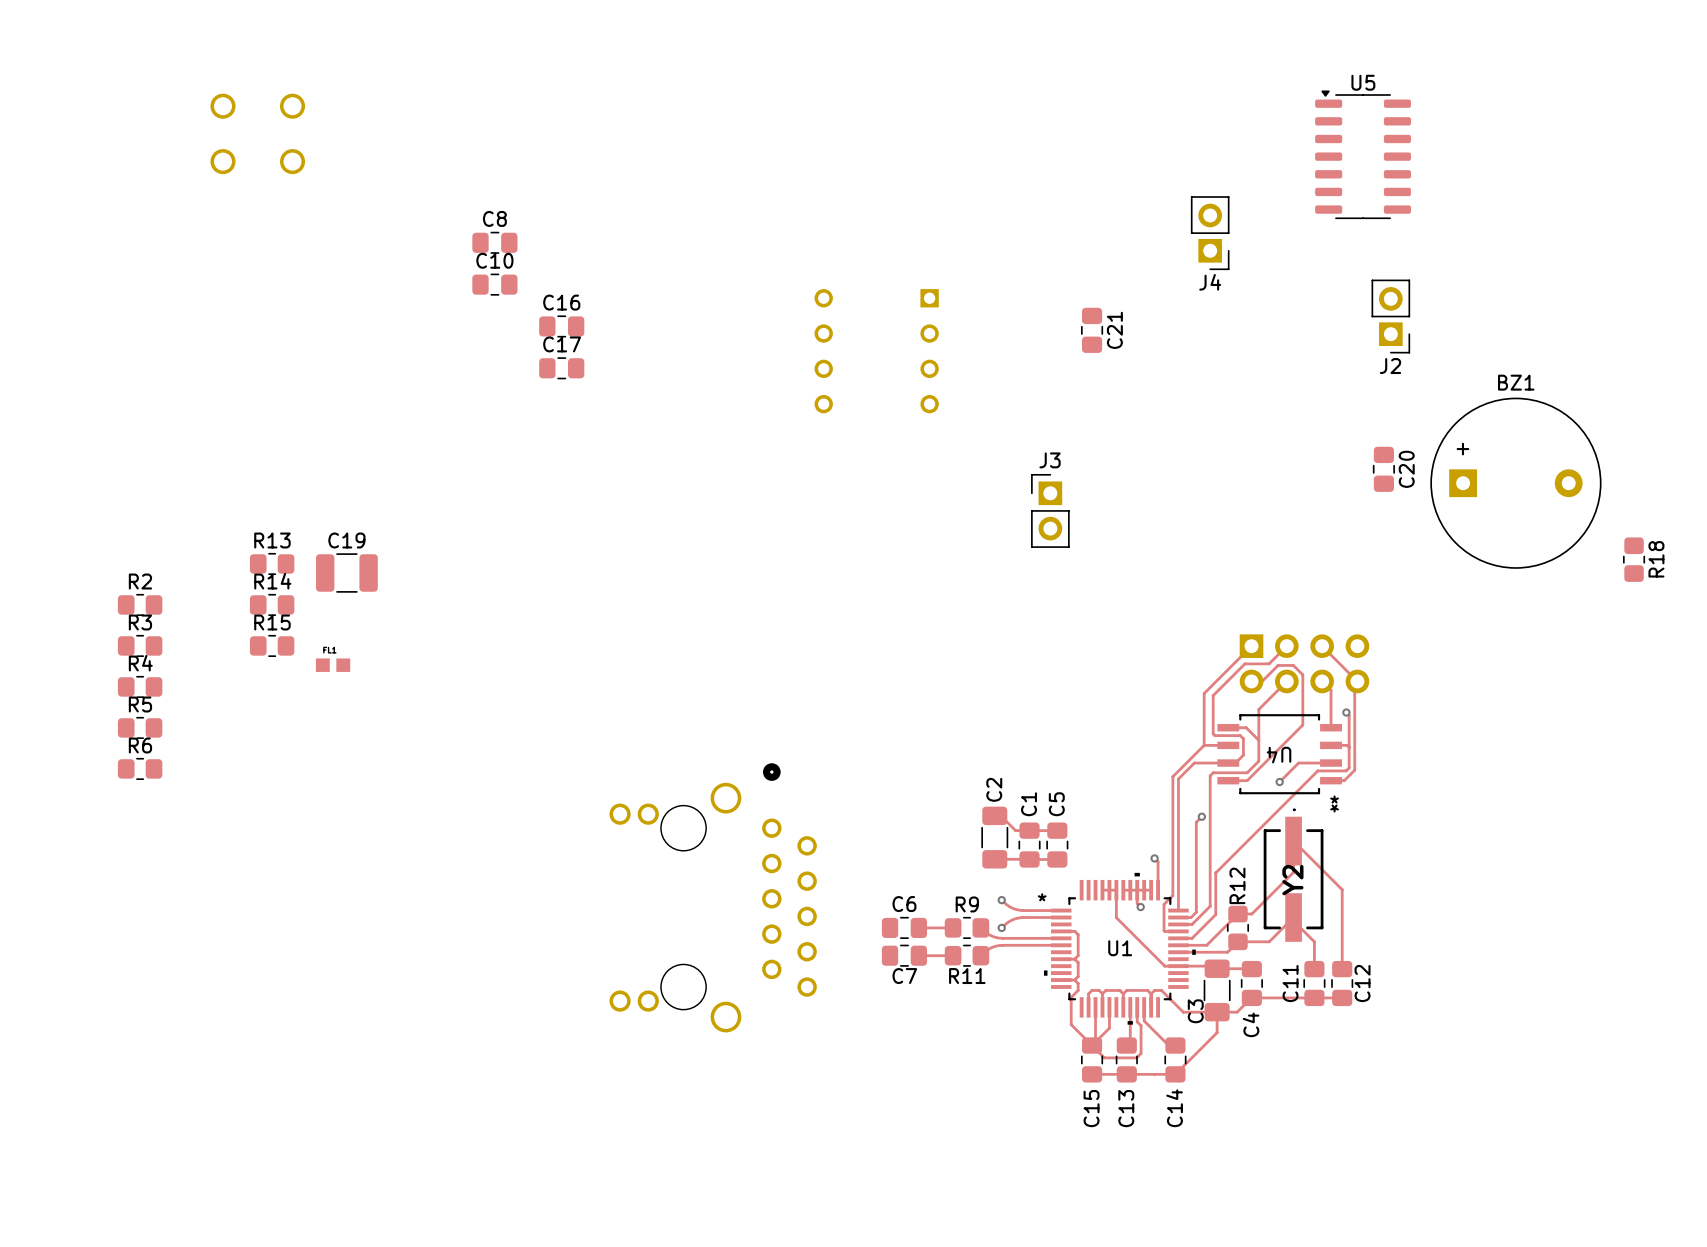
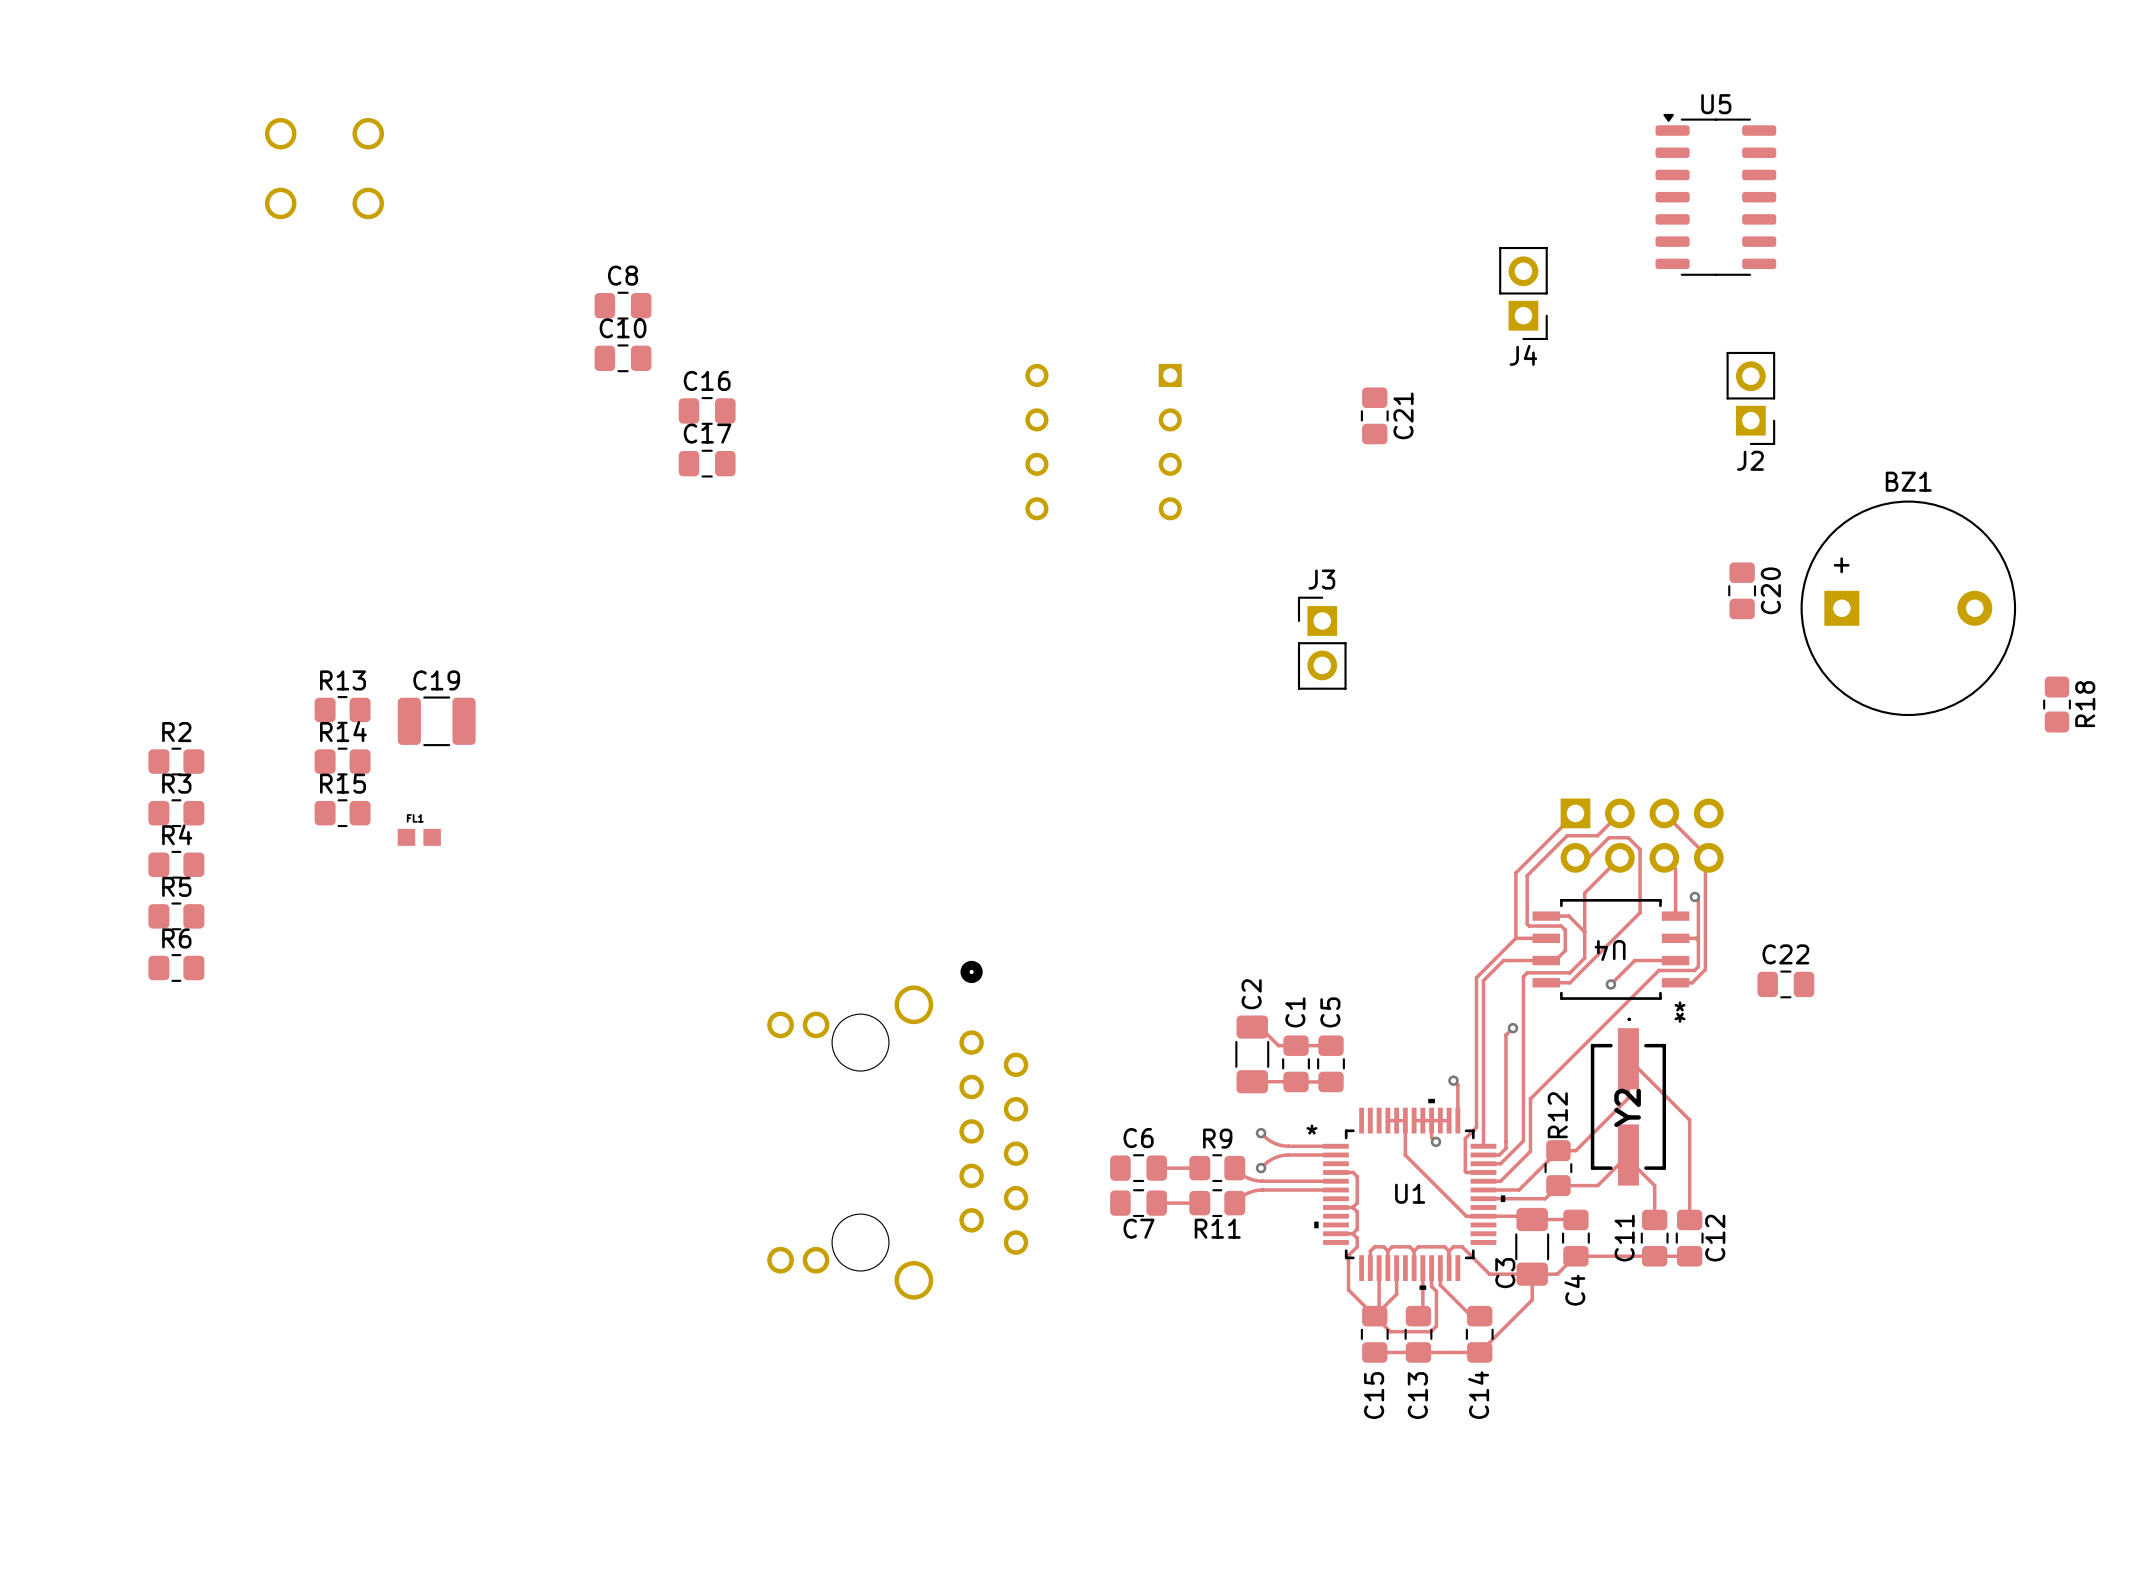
C22: none -> (1785, 984)

